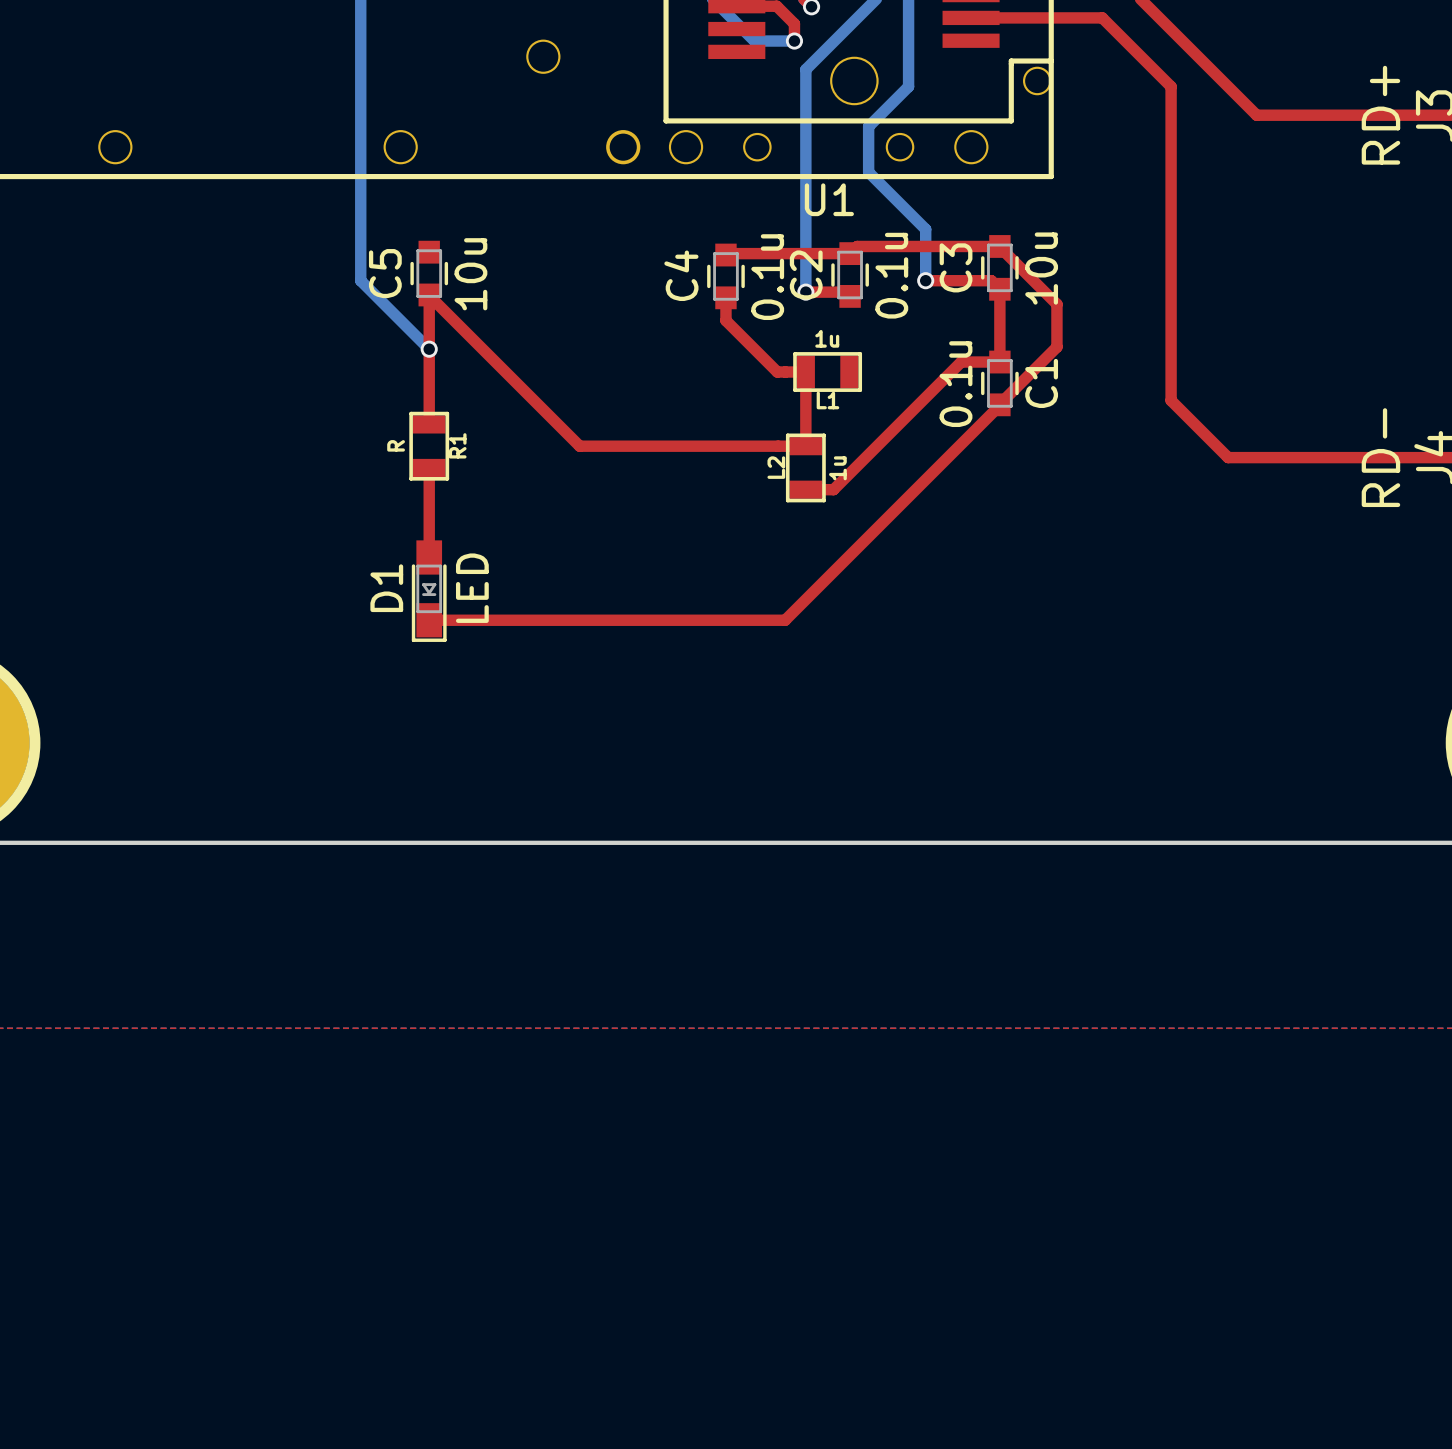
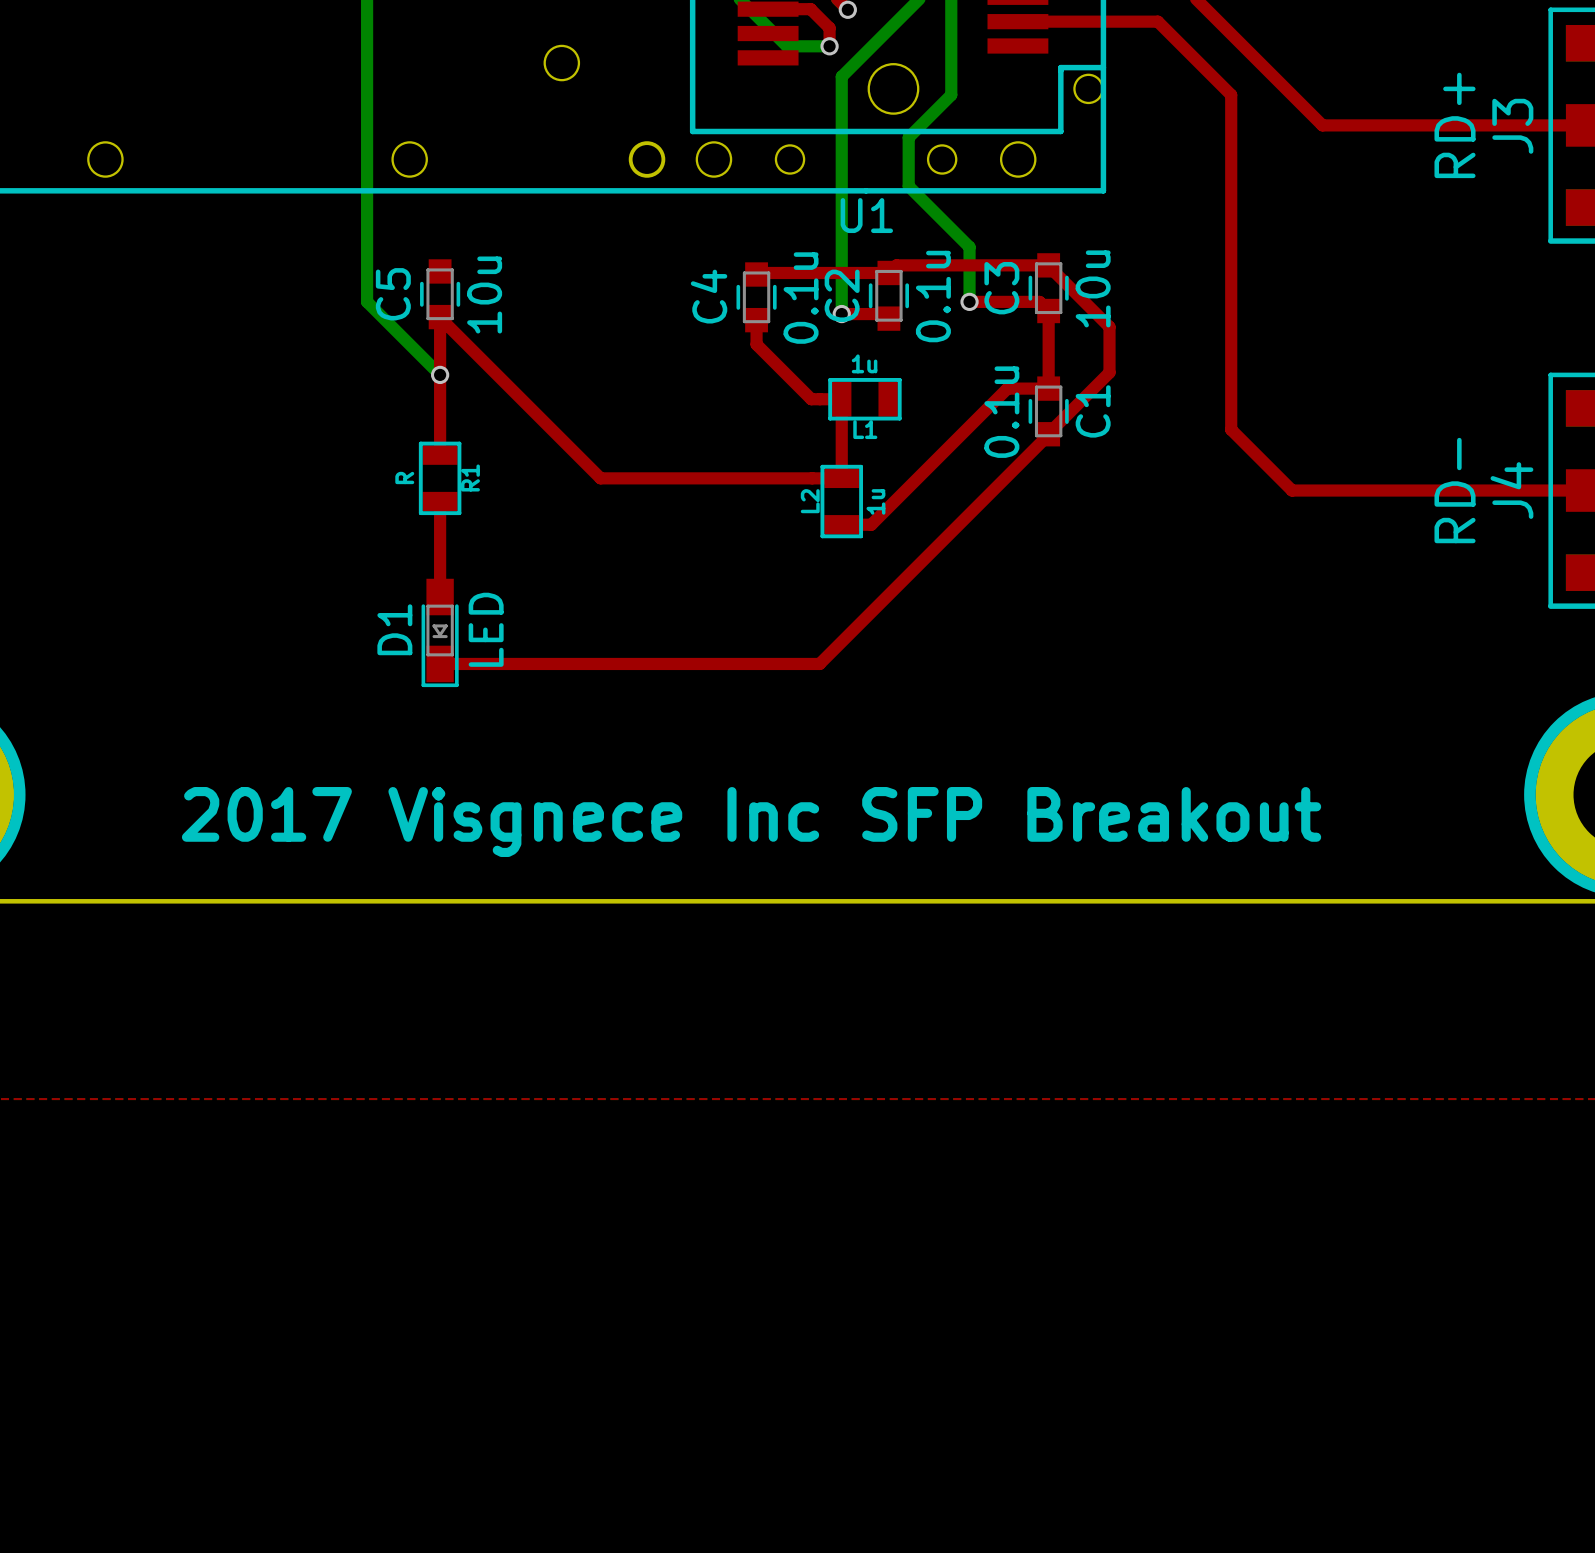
text: none -> 2017 Visgnece Inc SFP Breakout (751, 822)

